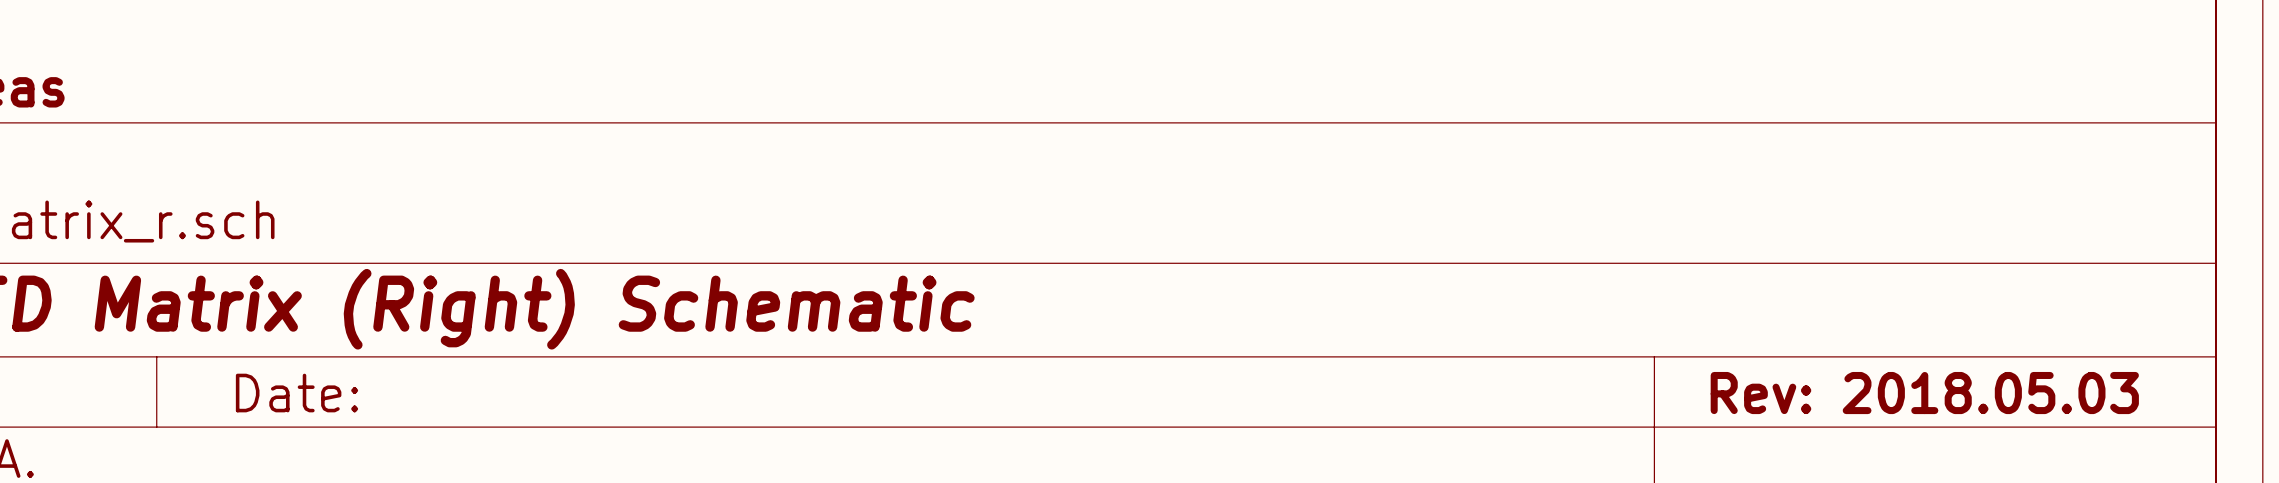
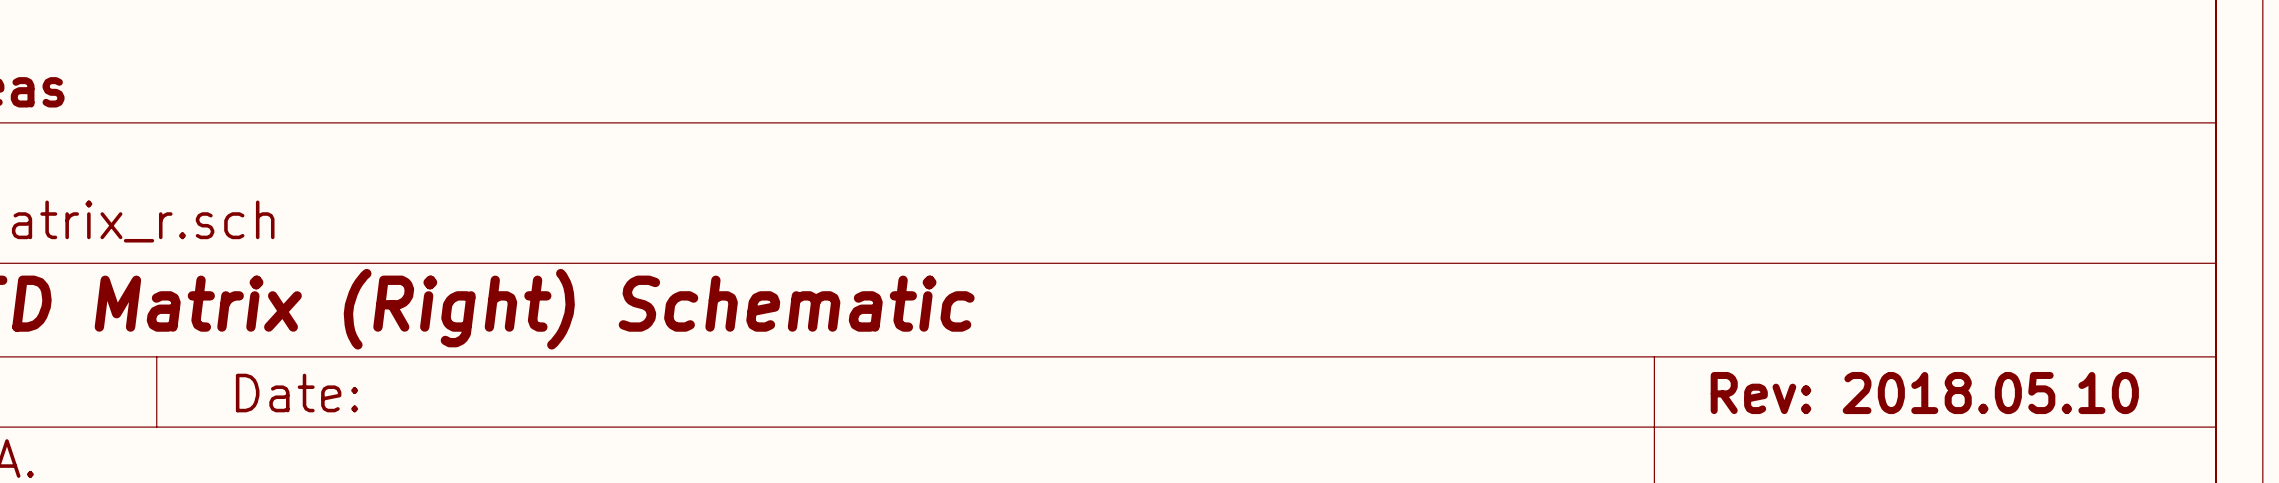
title block: Rev: 2018.05.03 (1924, 393) -> Rev: 2018.05.10 (1924, 393)

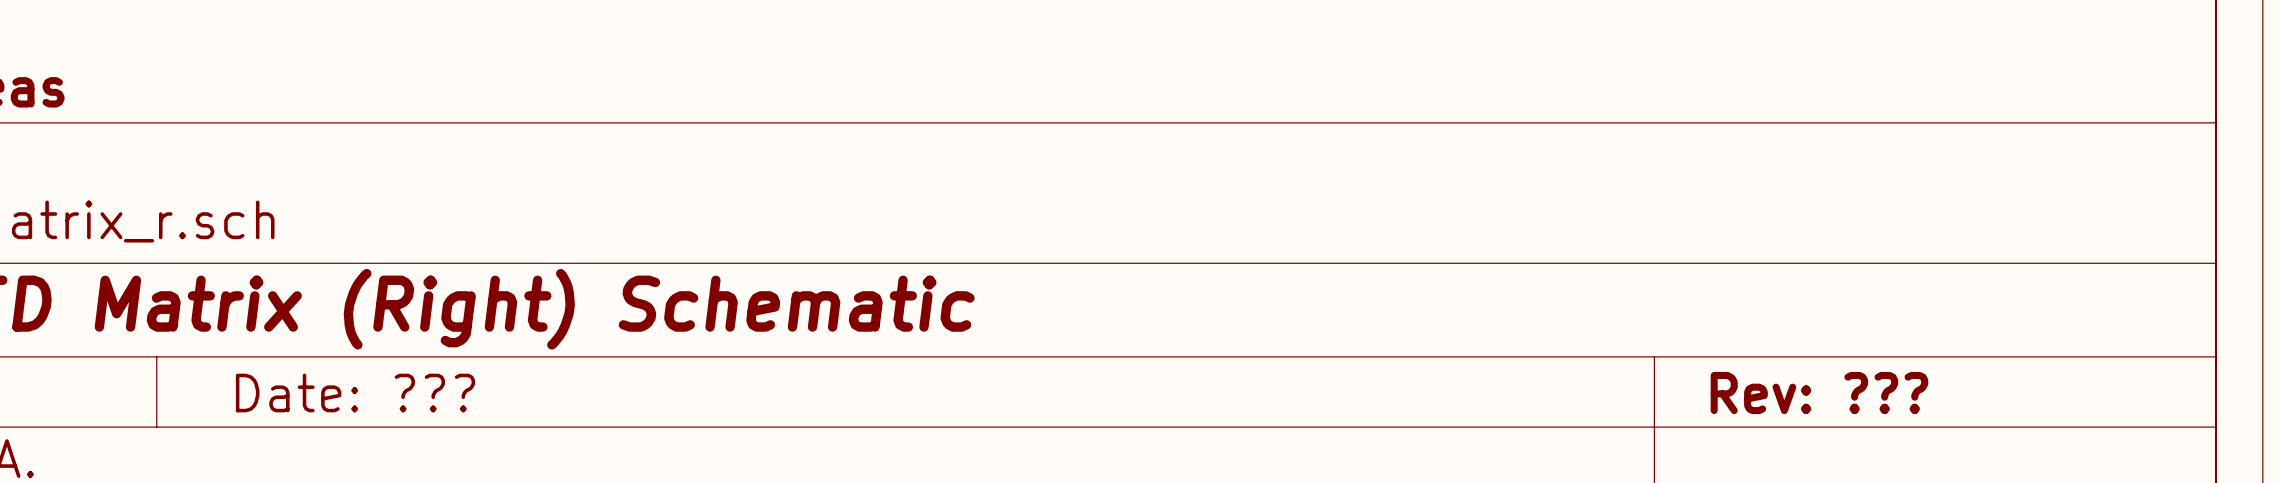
title block: Date: (296, 393) -> Date: ??? (355, 393)
title block: Rev: 2018.05.10 (1924, 393) -> Rev: ??? (1819, 393)

